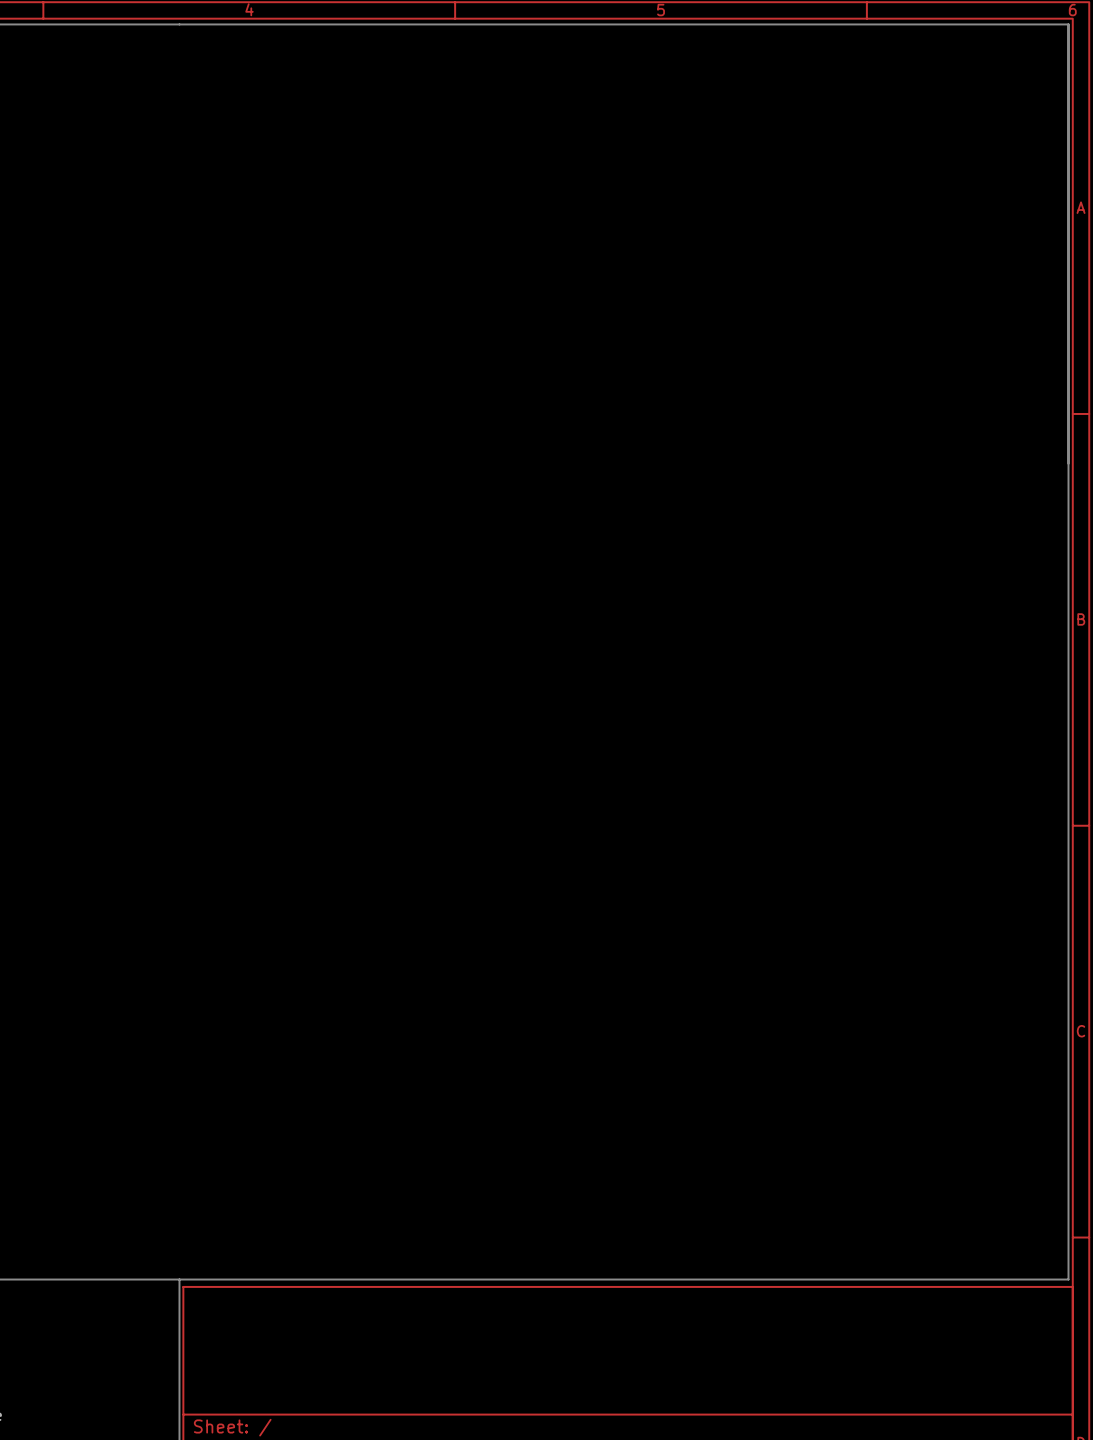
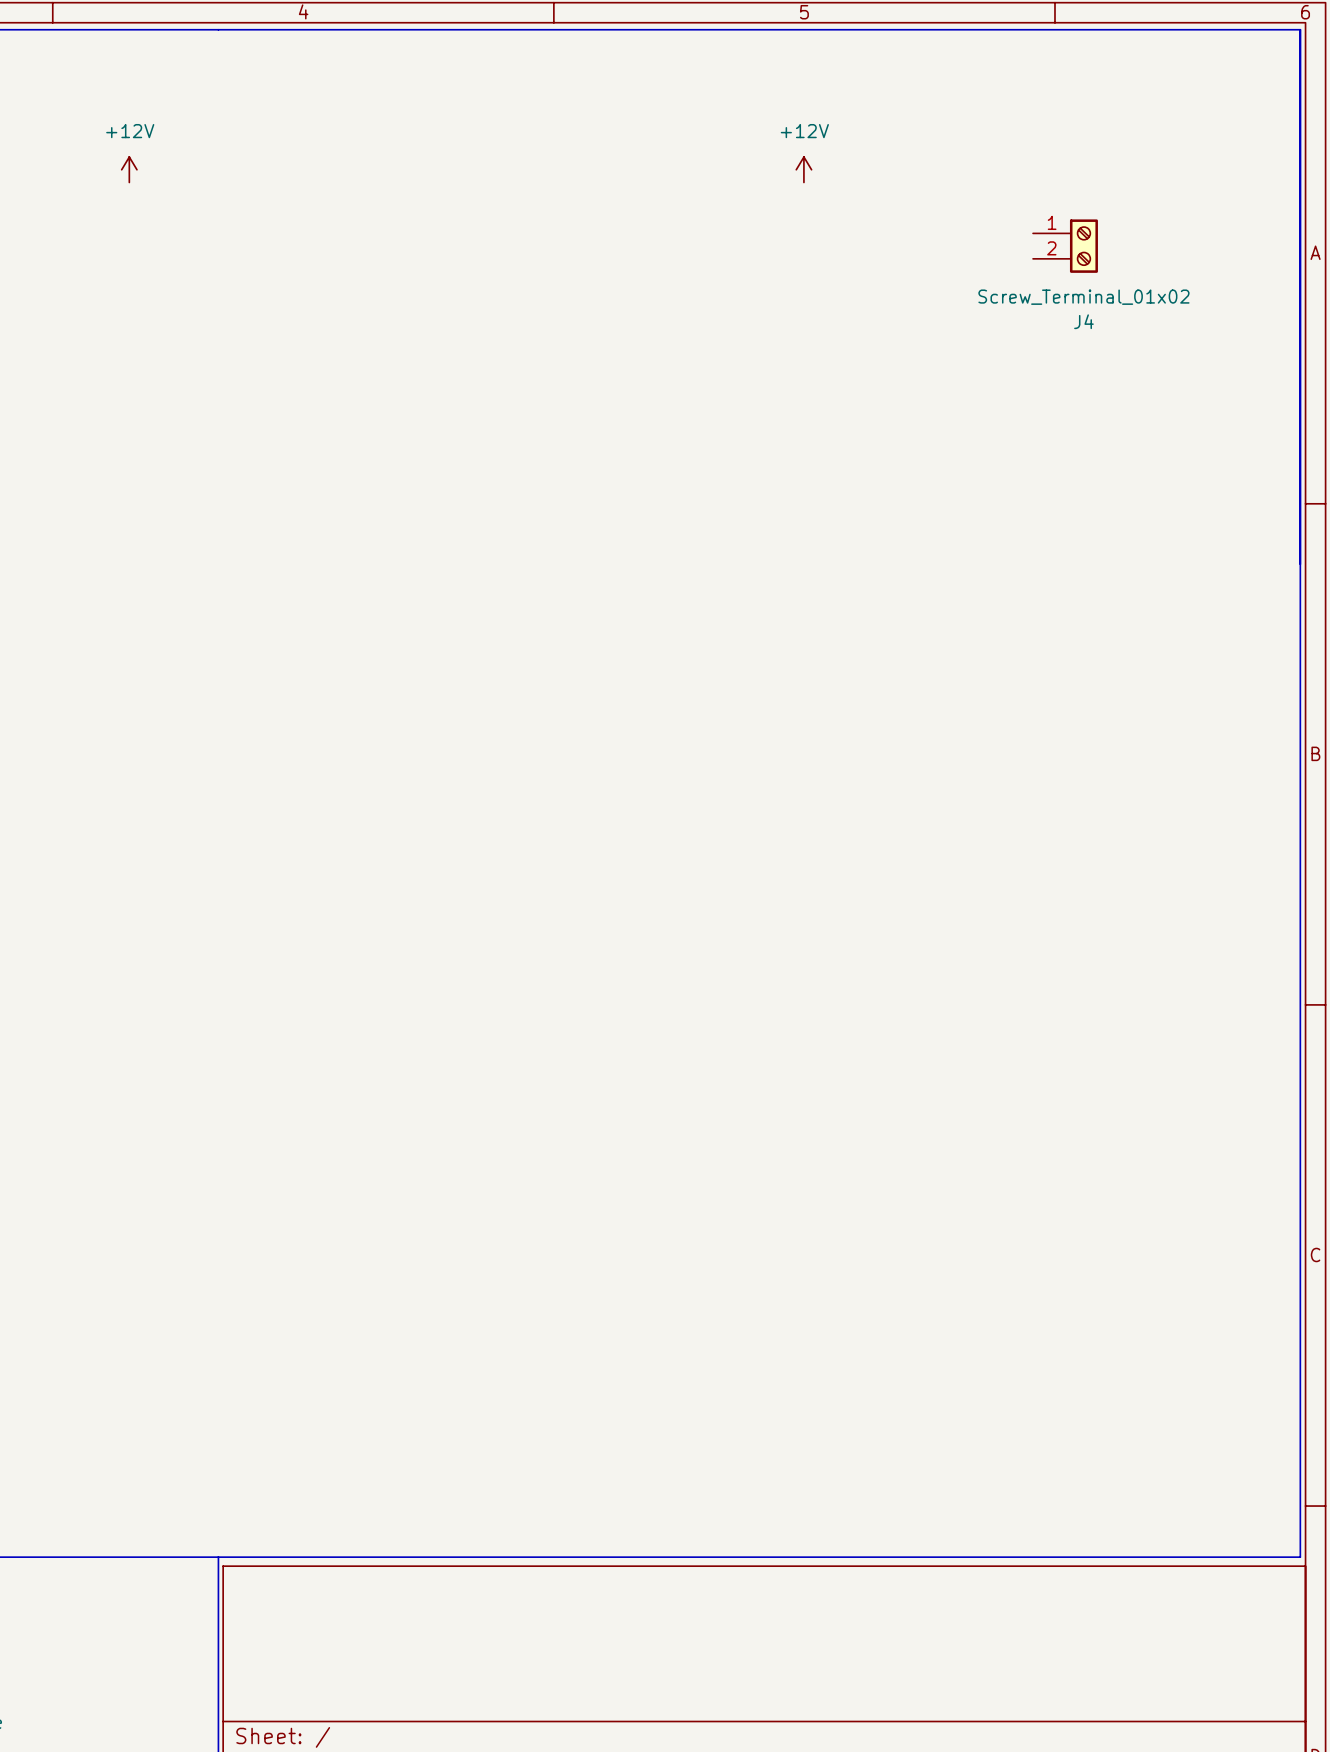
power symbol: none -> +12V (129, 169)
power symbol: none -> +12V (803, 169)
J4: none -> Screw_Terminal_01x02 (1065, 246)

